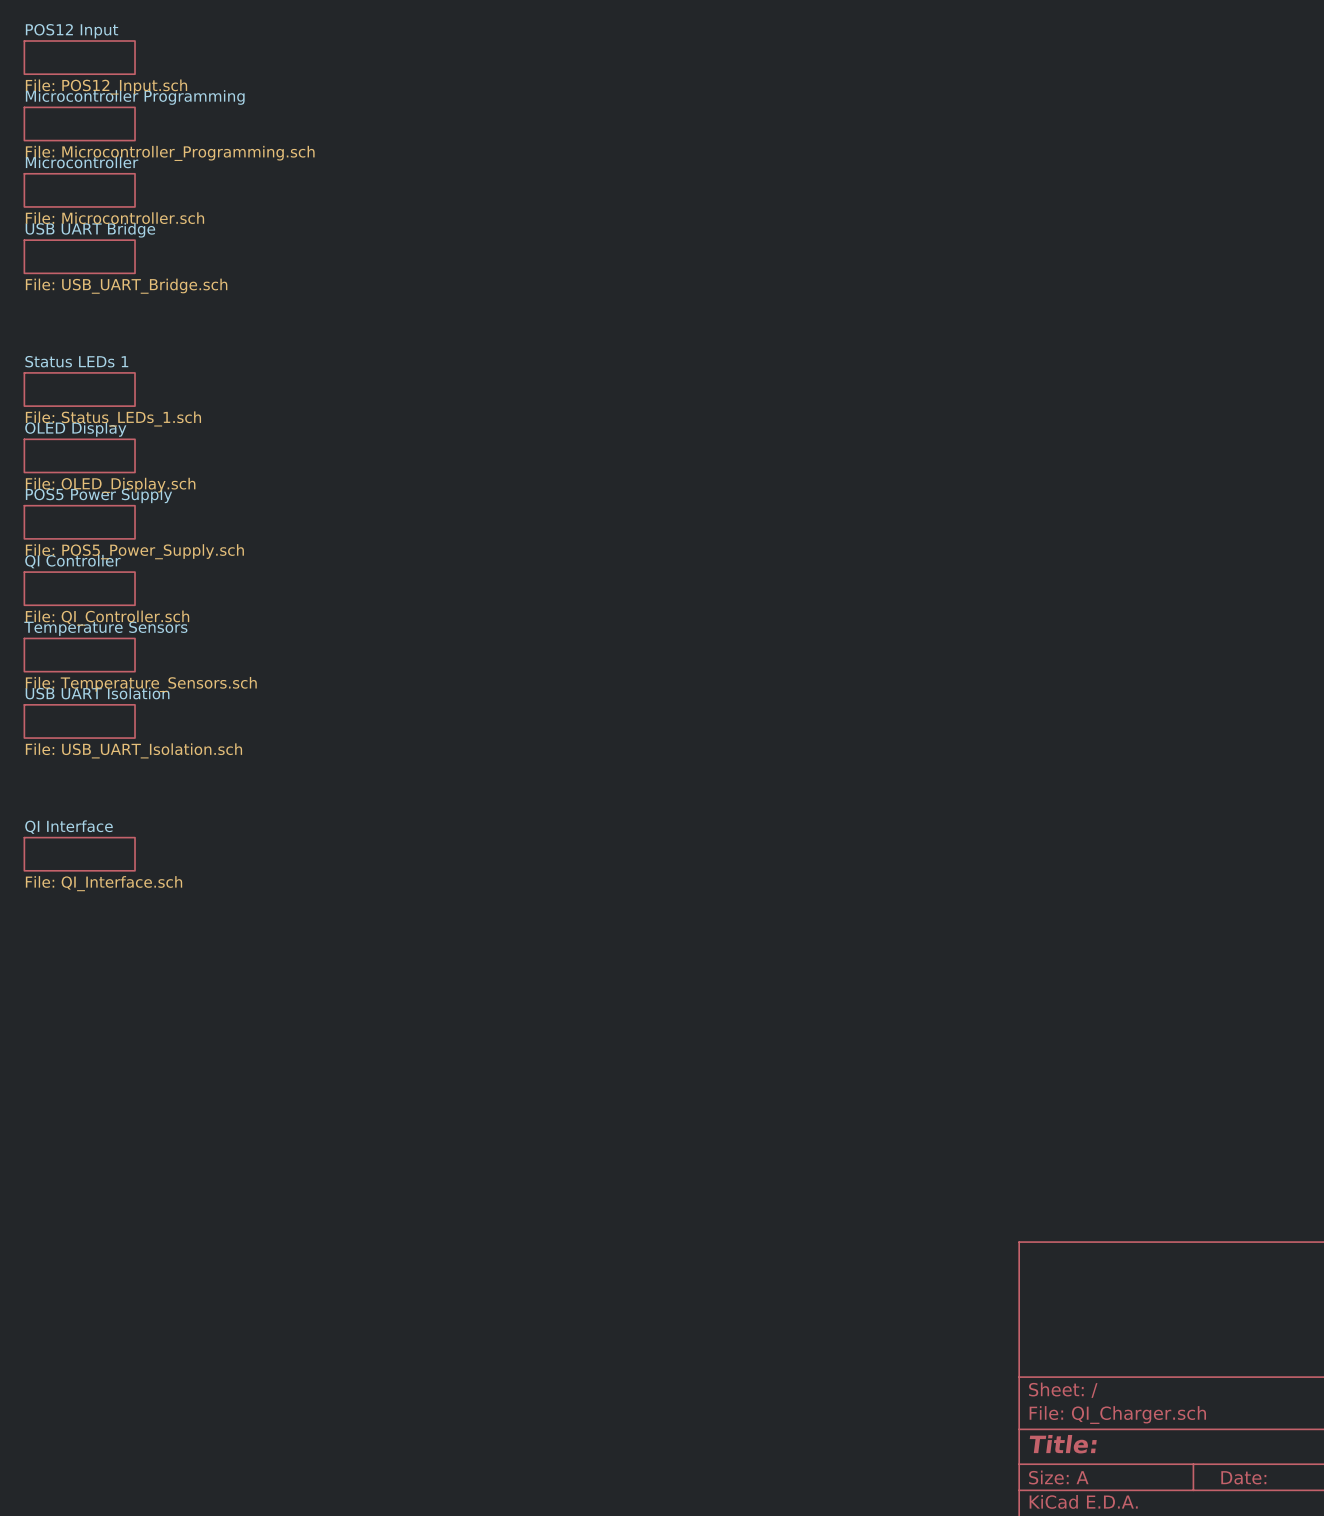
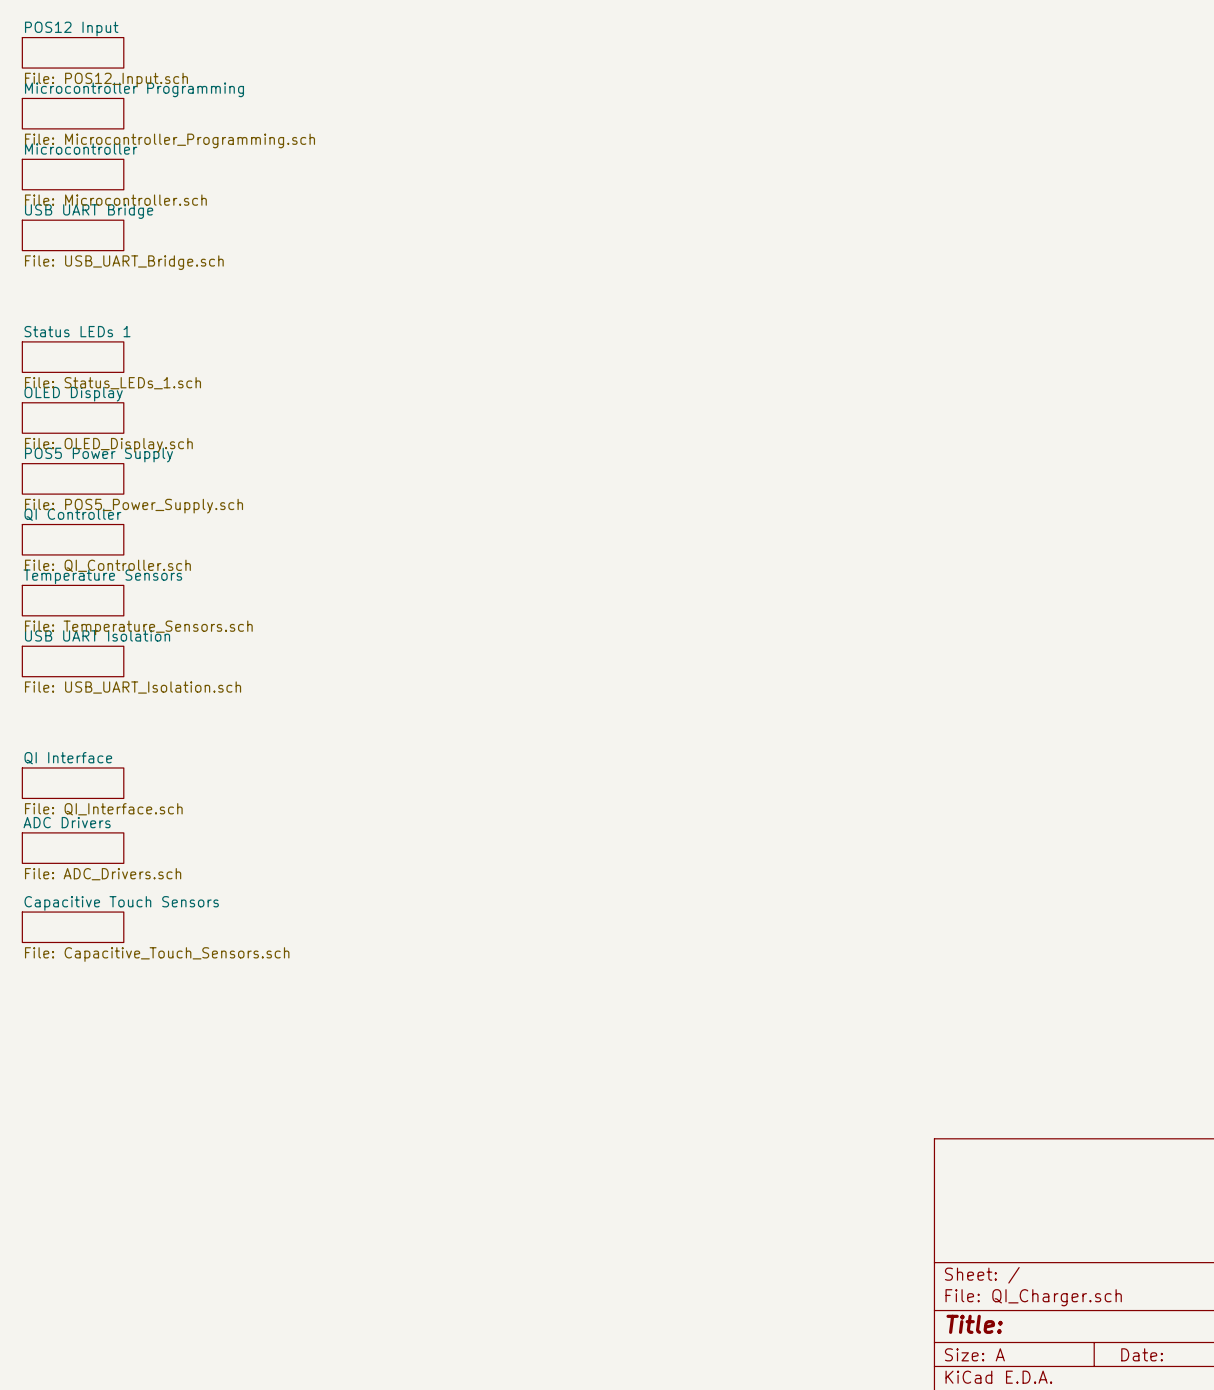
sheet ADC Drivers: none -> File: ADC_Drivers.sch (73, 848)
sheet Capacitive Touch Sensors: none -> File: Capacitive_Touch_Sensors.sch (73, 927)

